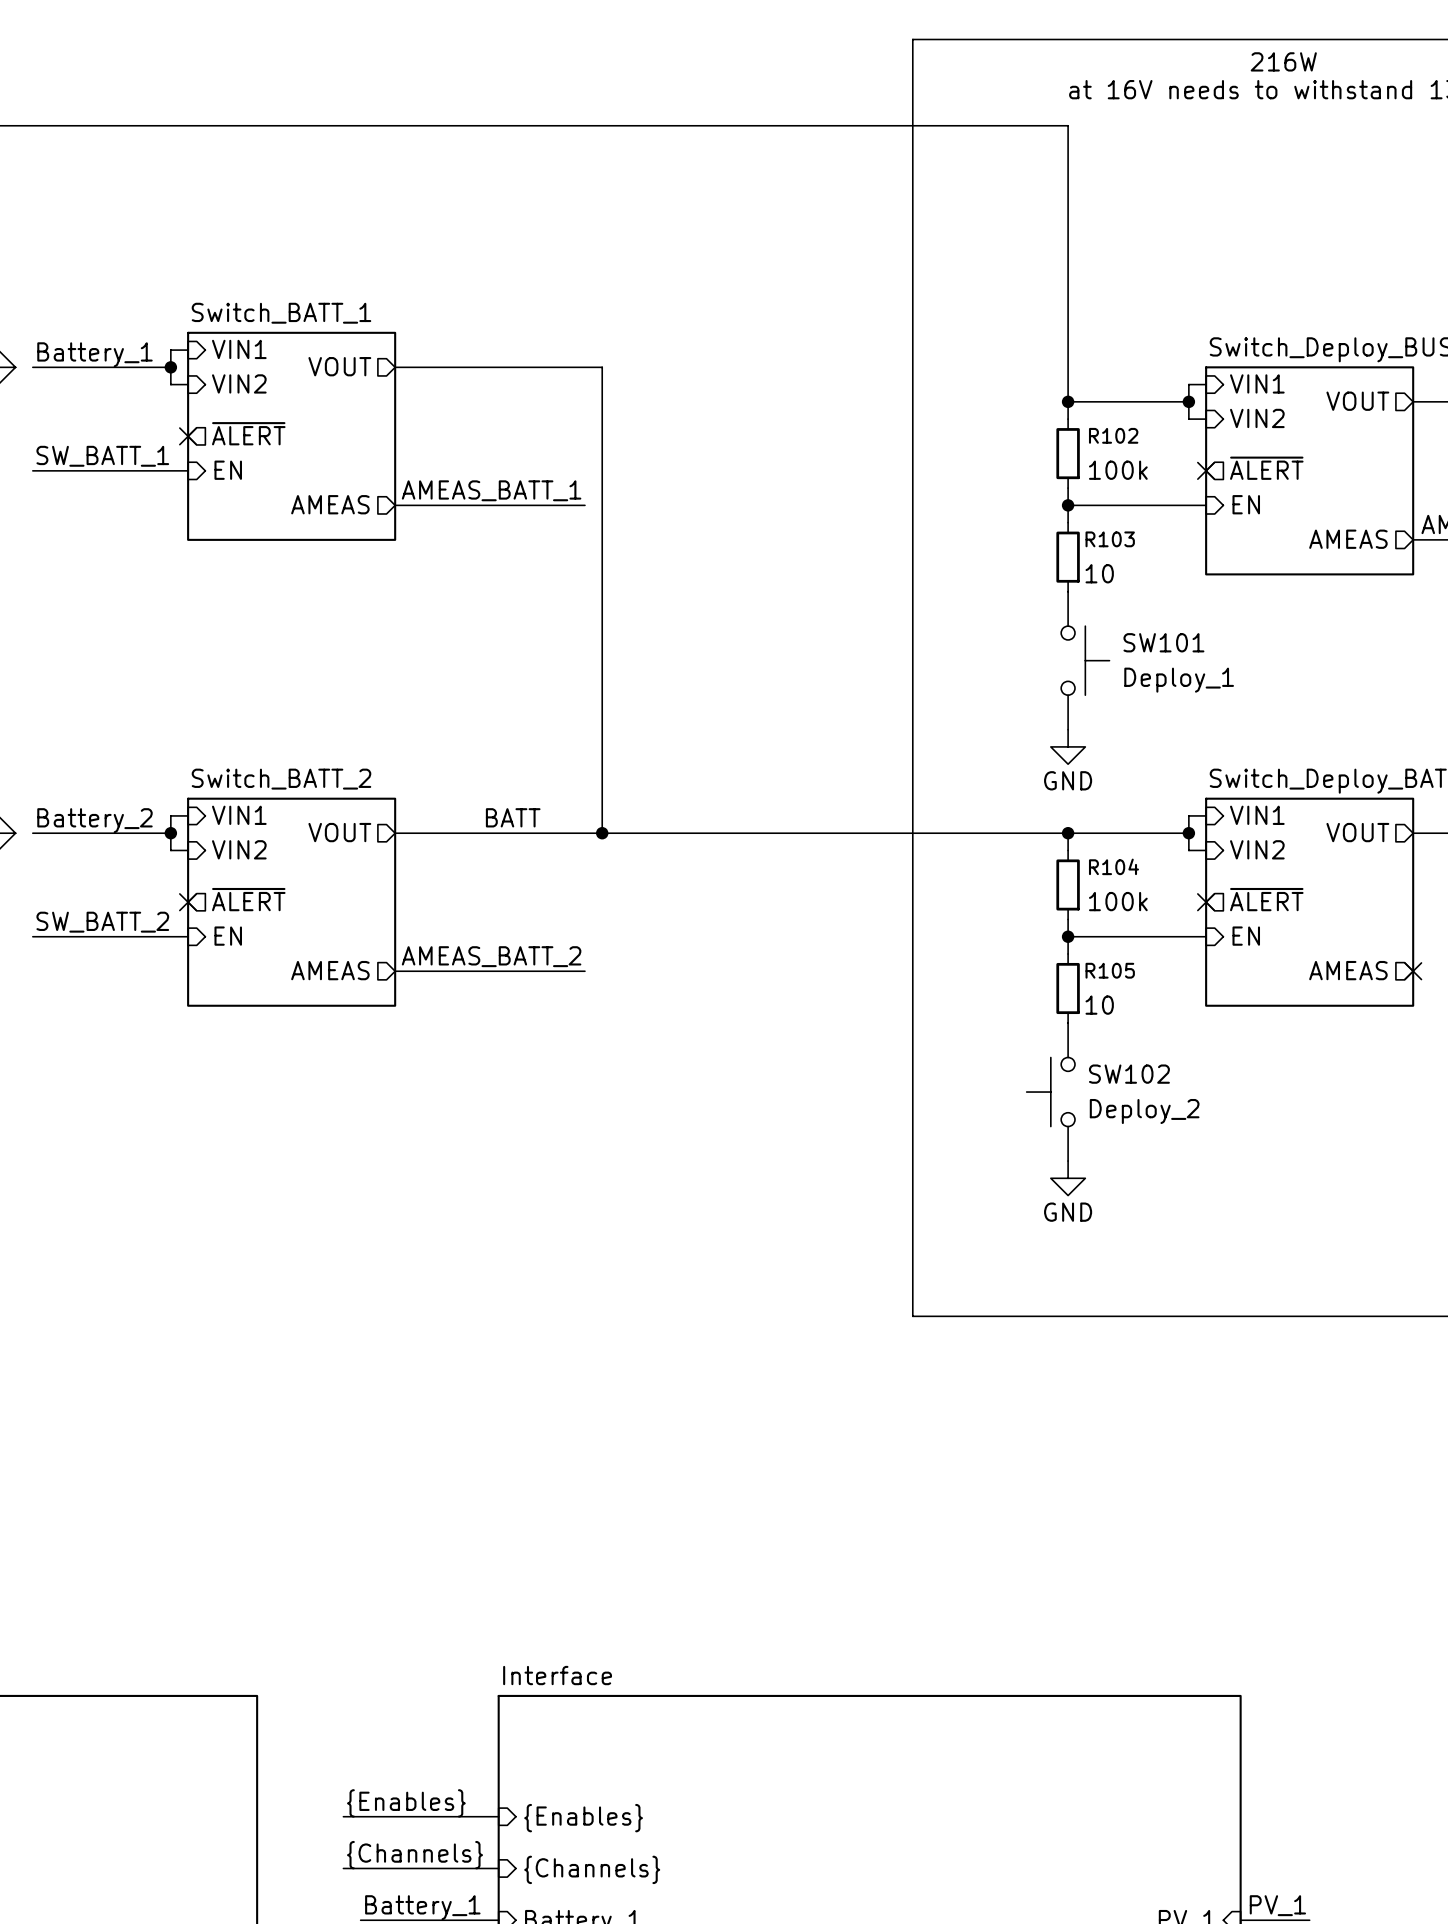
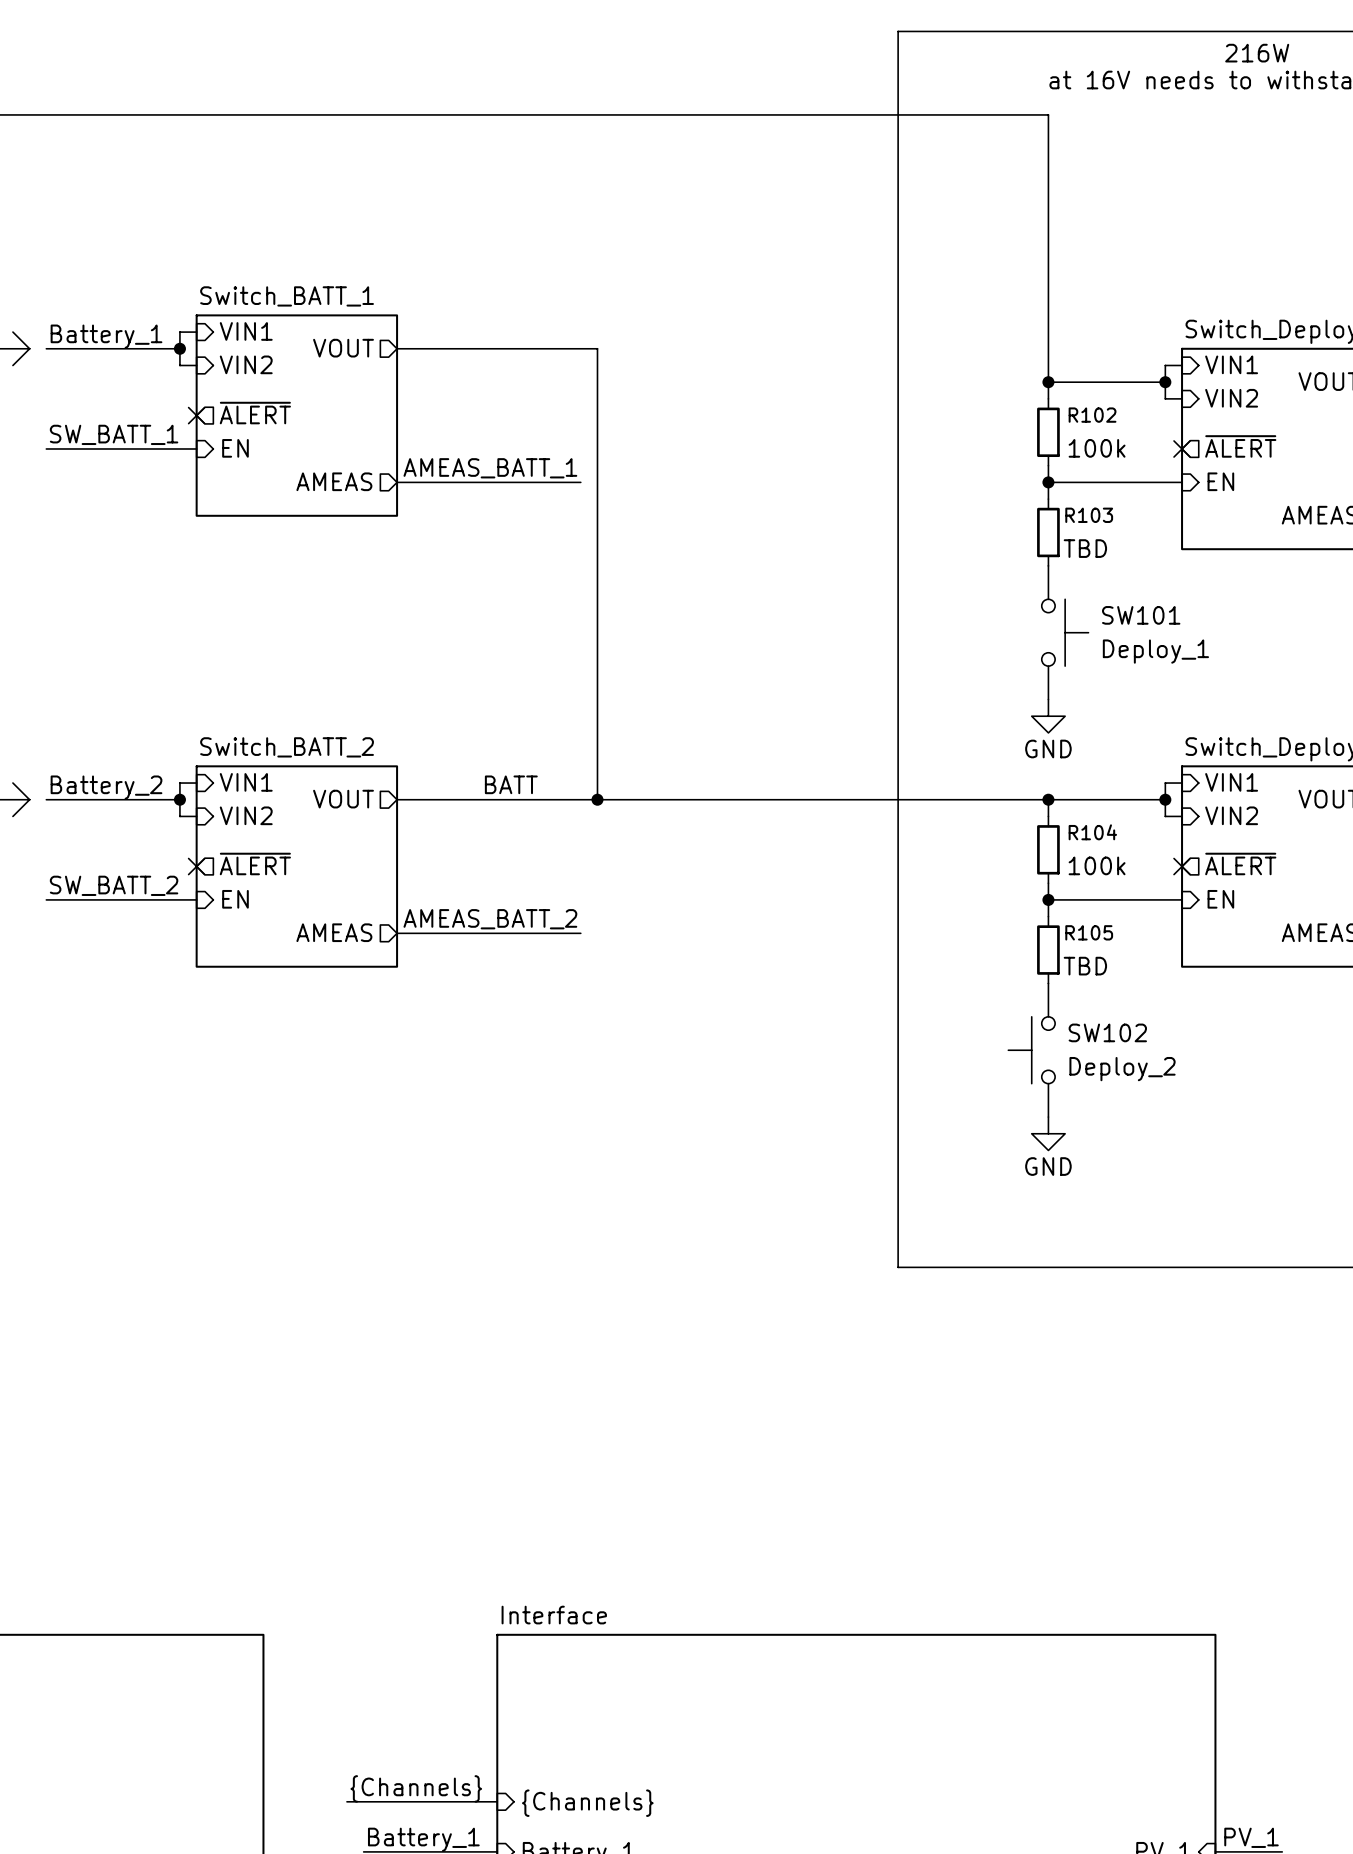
R103 value: 10 (1099, 573) -> TBD (1085, 548)
R105 value: 10 (1099, 1005) -> TBD (1085, 966)
label: {Enables} (406, 1803) -> none
bus: (343, 1816) (498, 1816) -> none
sheet pin: {Enables} (583, 1818) -> none

